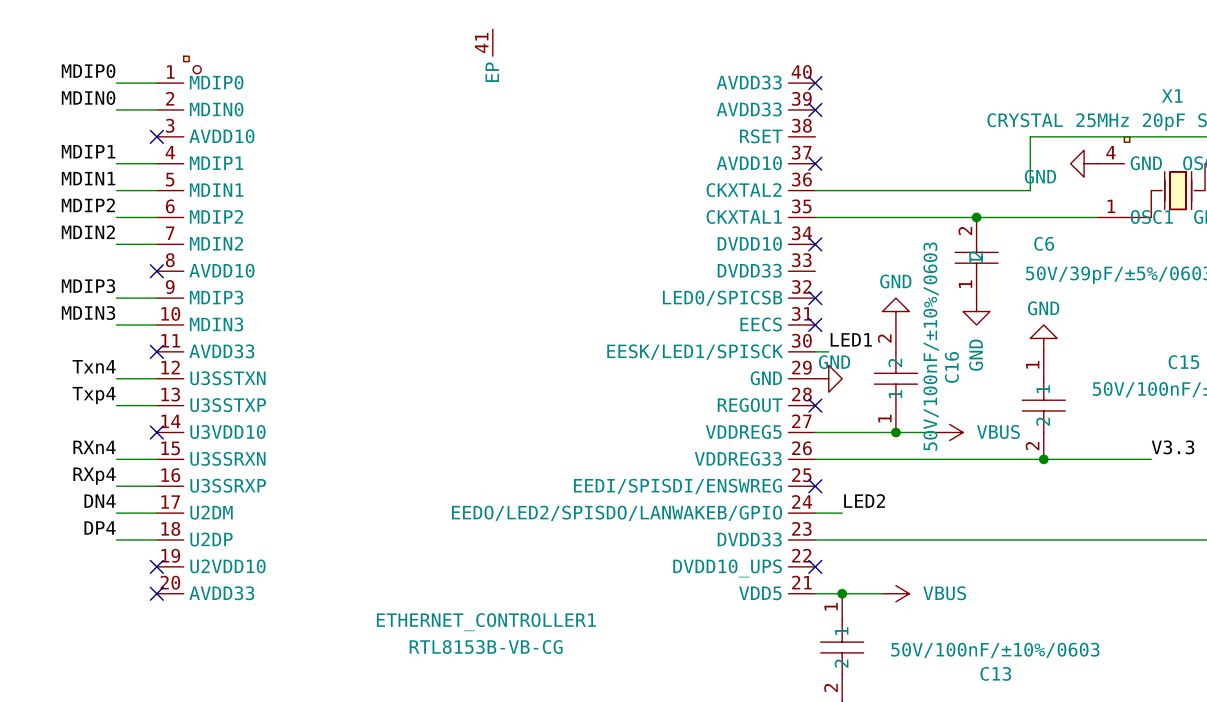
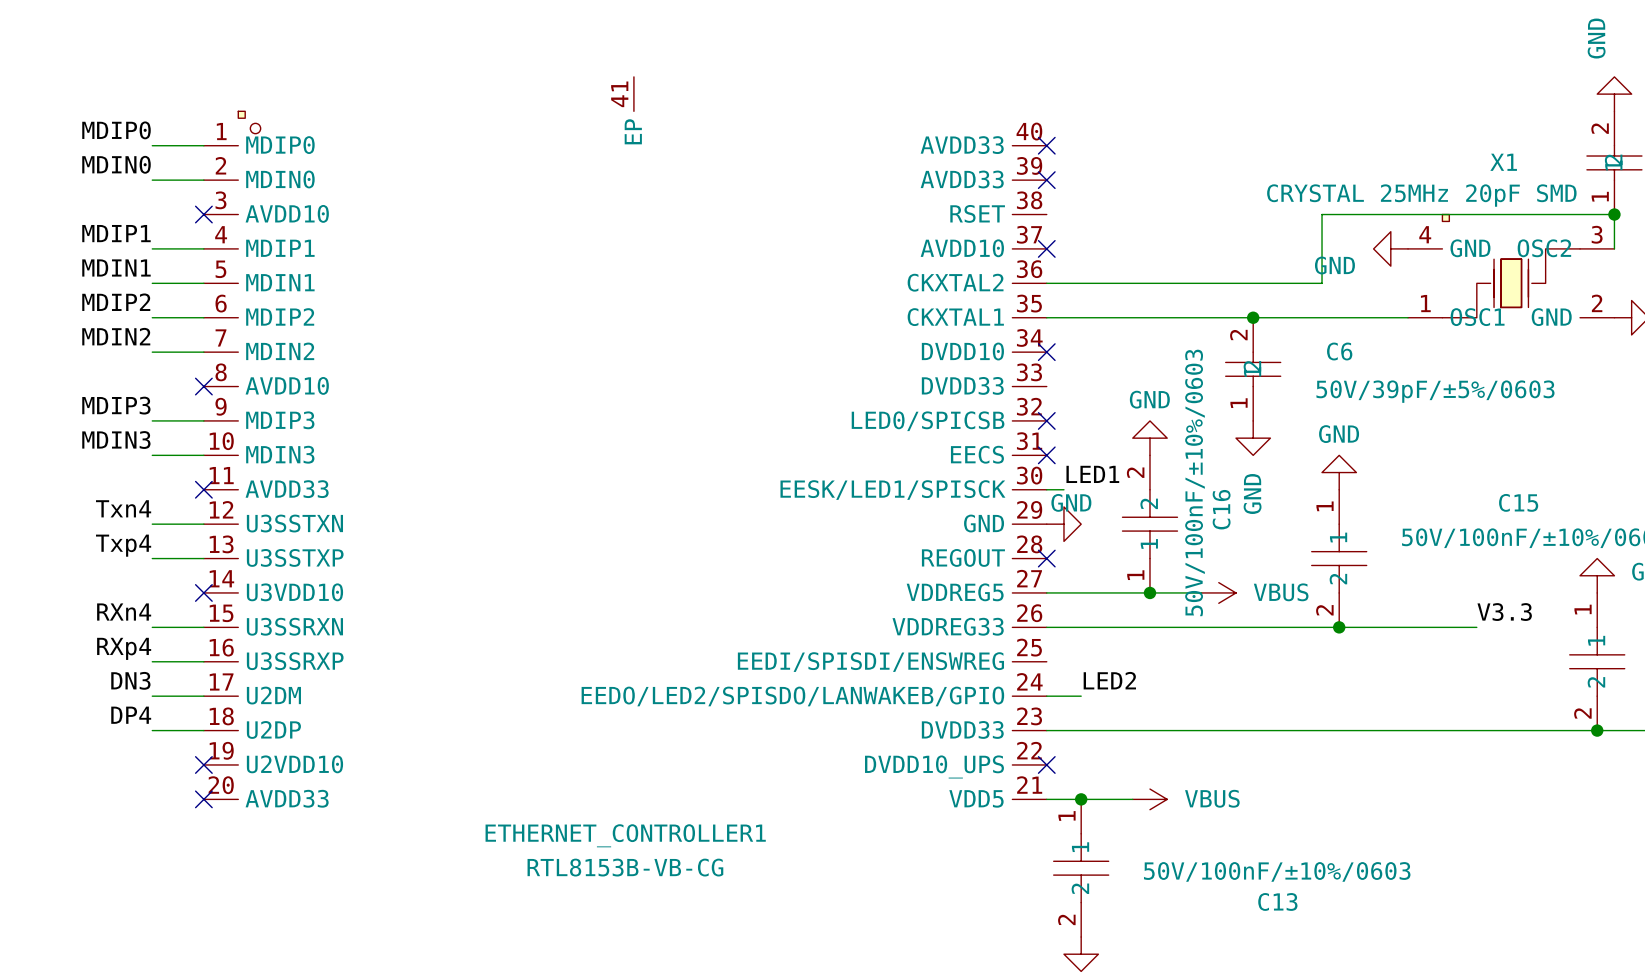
no-connect mark: (815, 486) -> none
label: DN4 (100, 501) -> DN3 (130, 680)

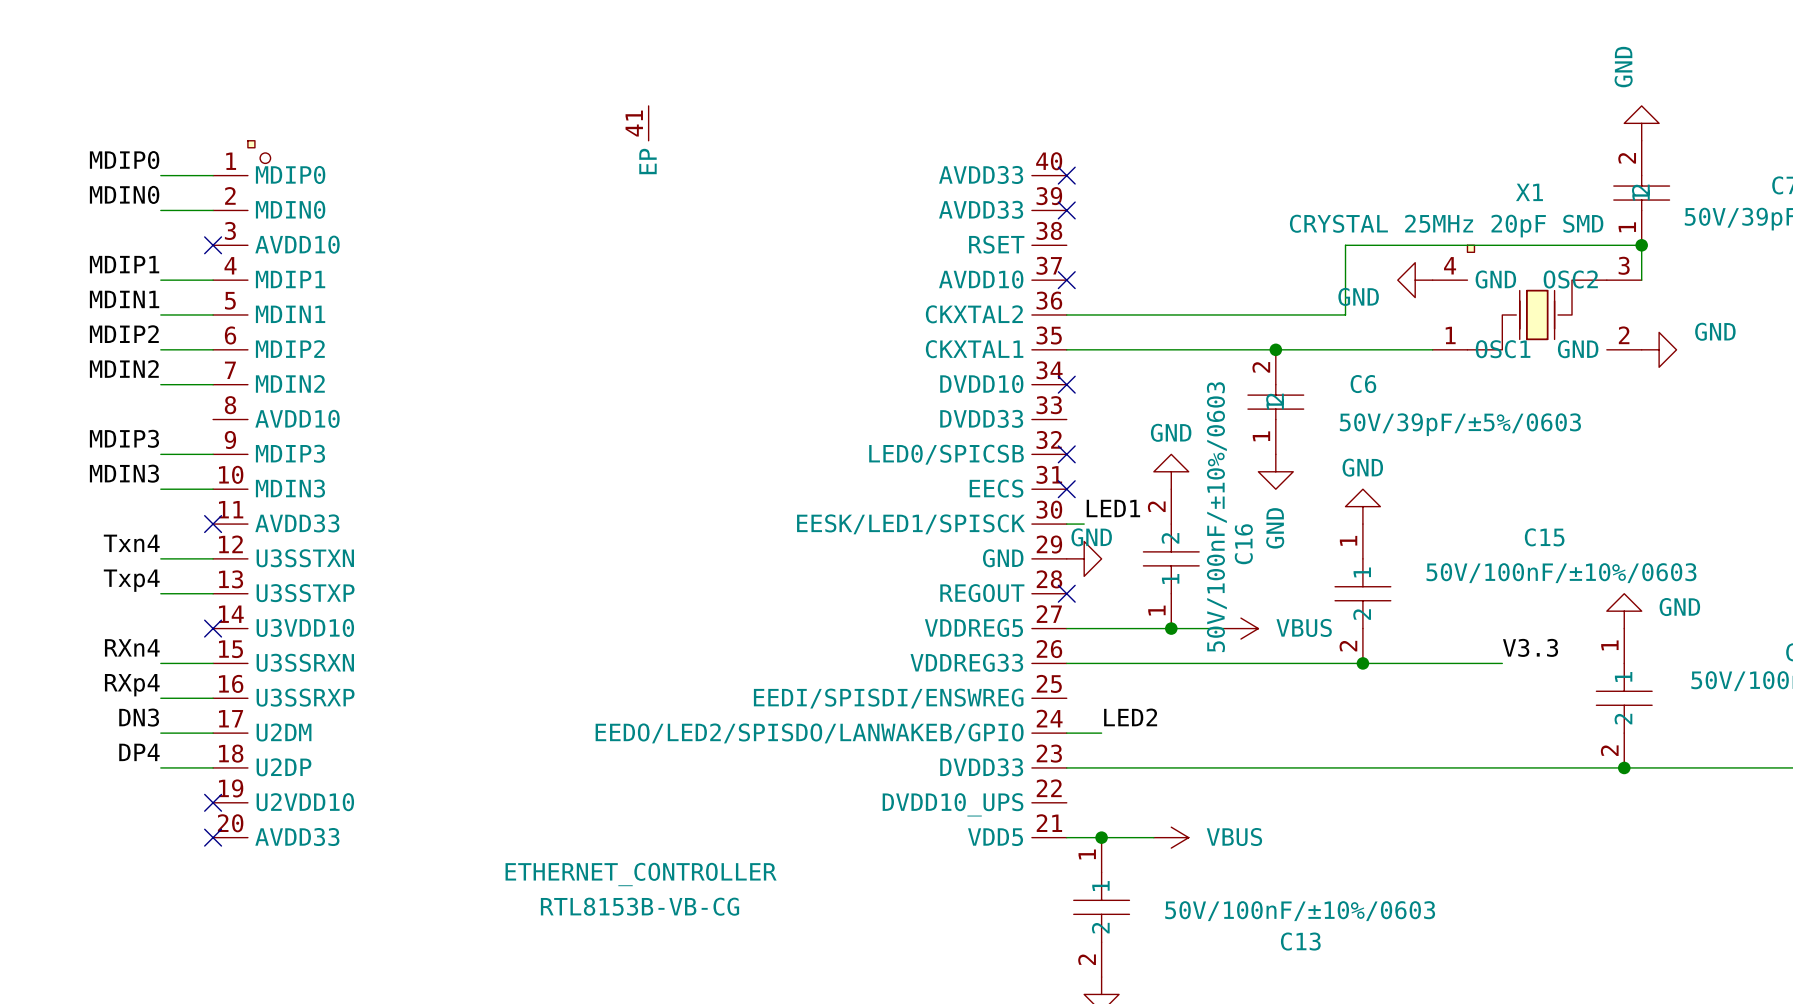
no-connect mark: (203, 386) -> none
no-connect mark: (1046, 764) -> none
ETHERNET_CONTROLLER1 name: ETHERNET_CONTROLLER1 (625, 835) -> ETHERNET_CONTROLLER (641, 874)

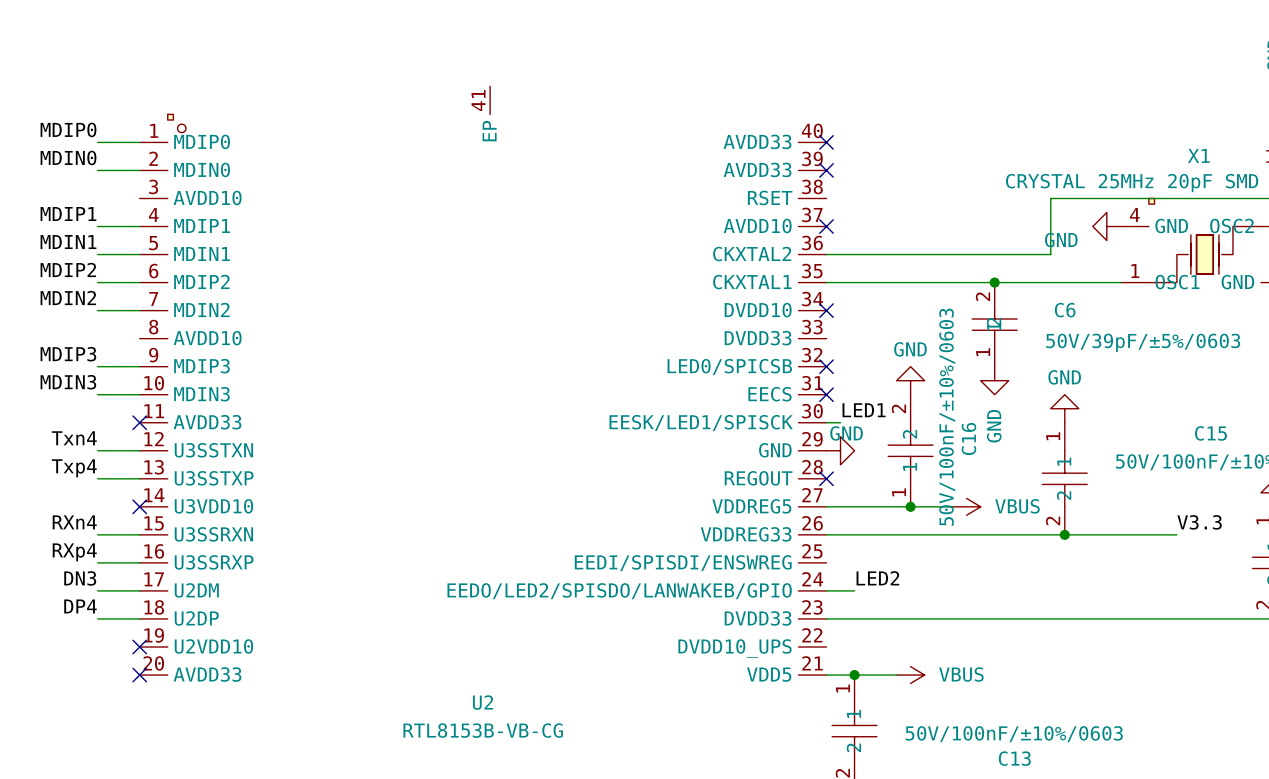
no-connect mark: (213, 245) -> none
ETHERNET_CONTROLLER name: ETHERNET_CONTROLLER (641, 874) -> U2 (482, 702)

